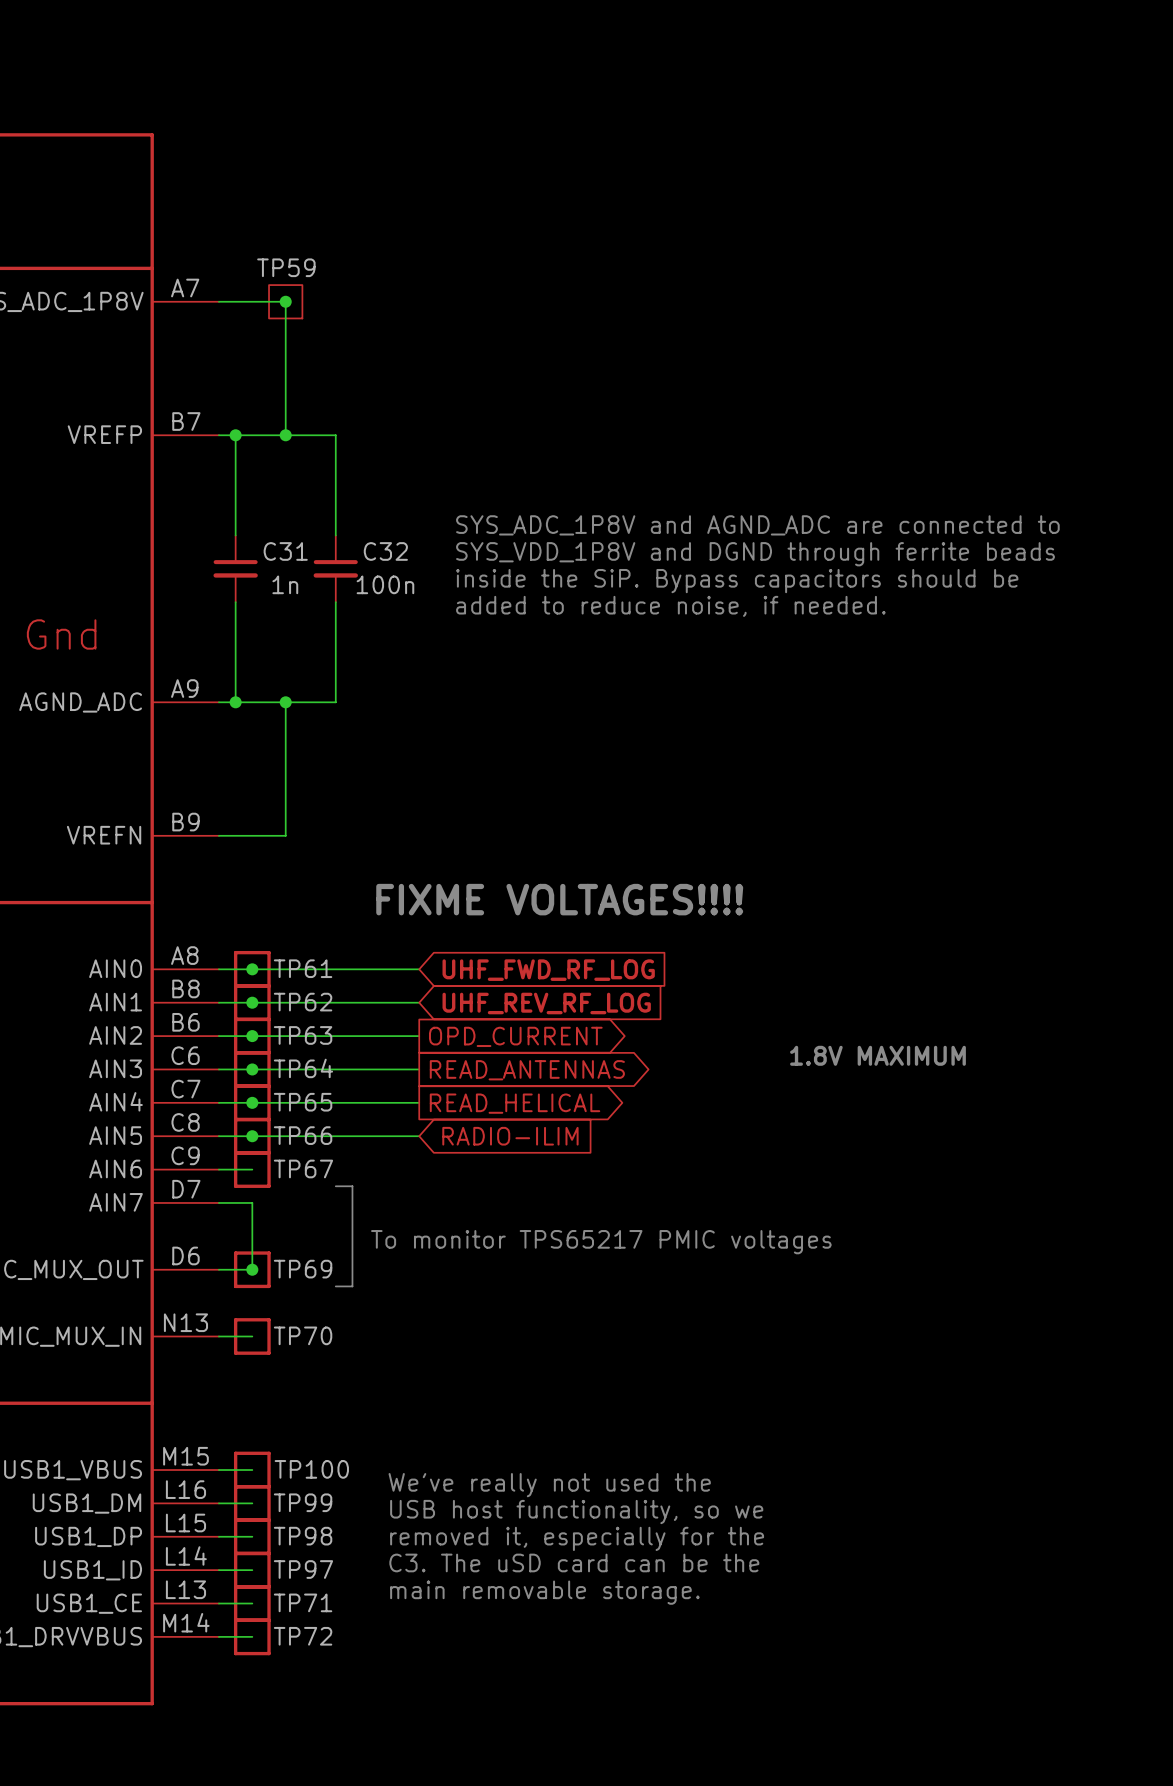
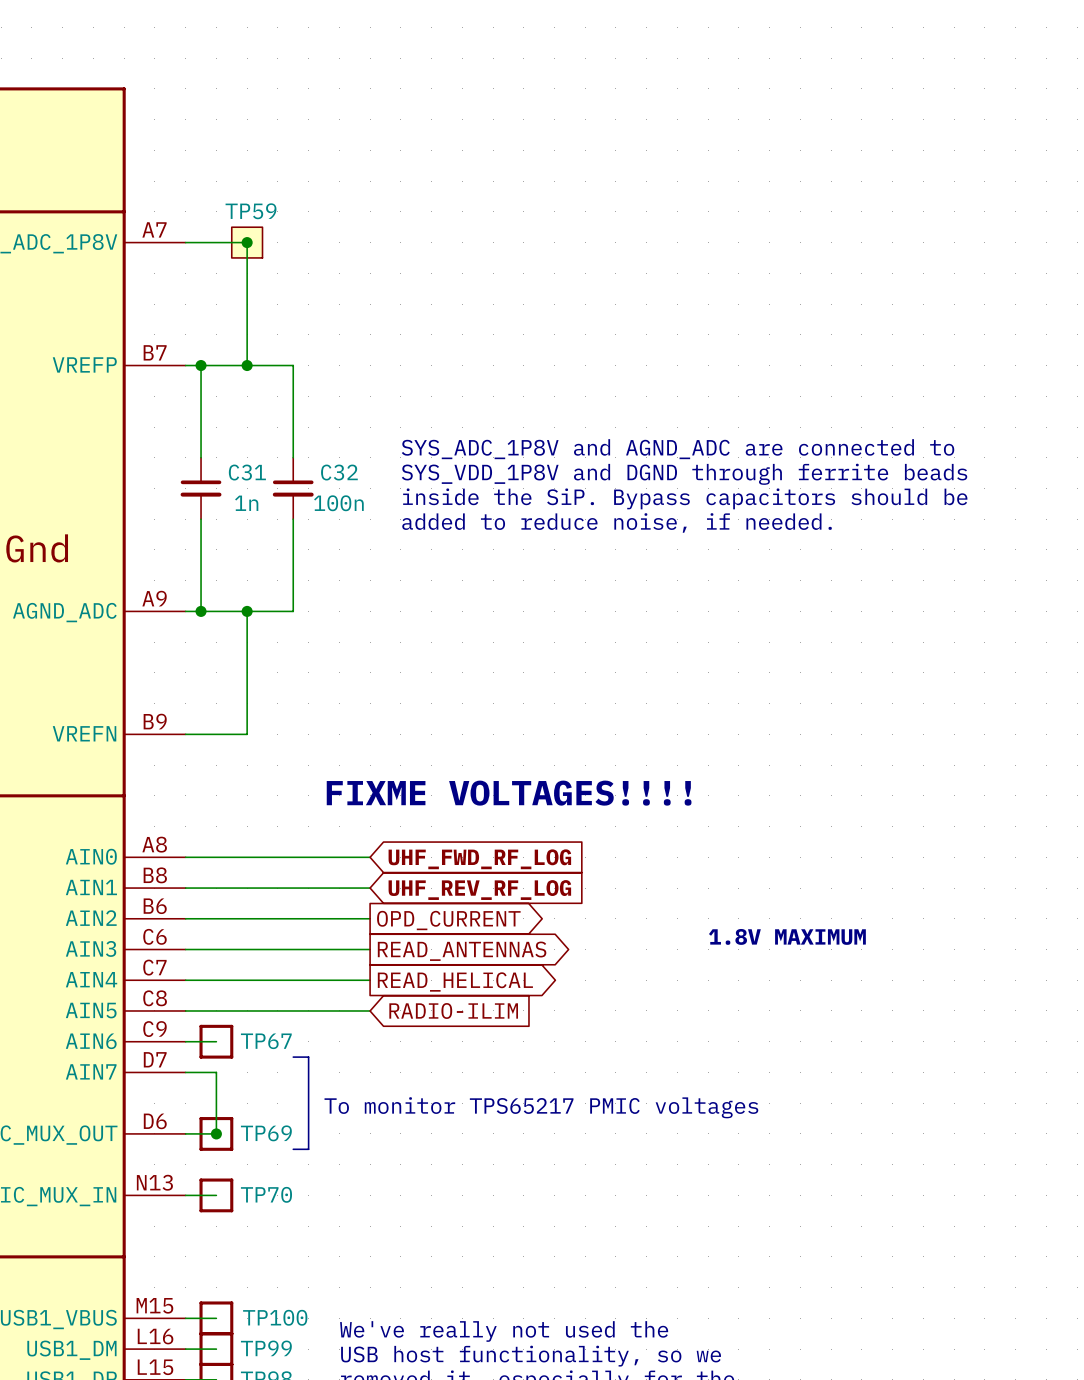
junction: (252, 969) -> none
TP61: (252, 969) -> none
junction: (252, 1002) -> none
TP62: (252, 1002) -> none
junction: (252, 1036) -> none
TP63: (252, 1036) -> none
junction: (252, 1069) -> none
TP64: (252, 1069) -> none
junction: (252, 1102) -> none
TP65: (252, 1102) -> none
junction: (252, 1136) -> none
TP66: (252, 1136) -> none

